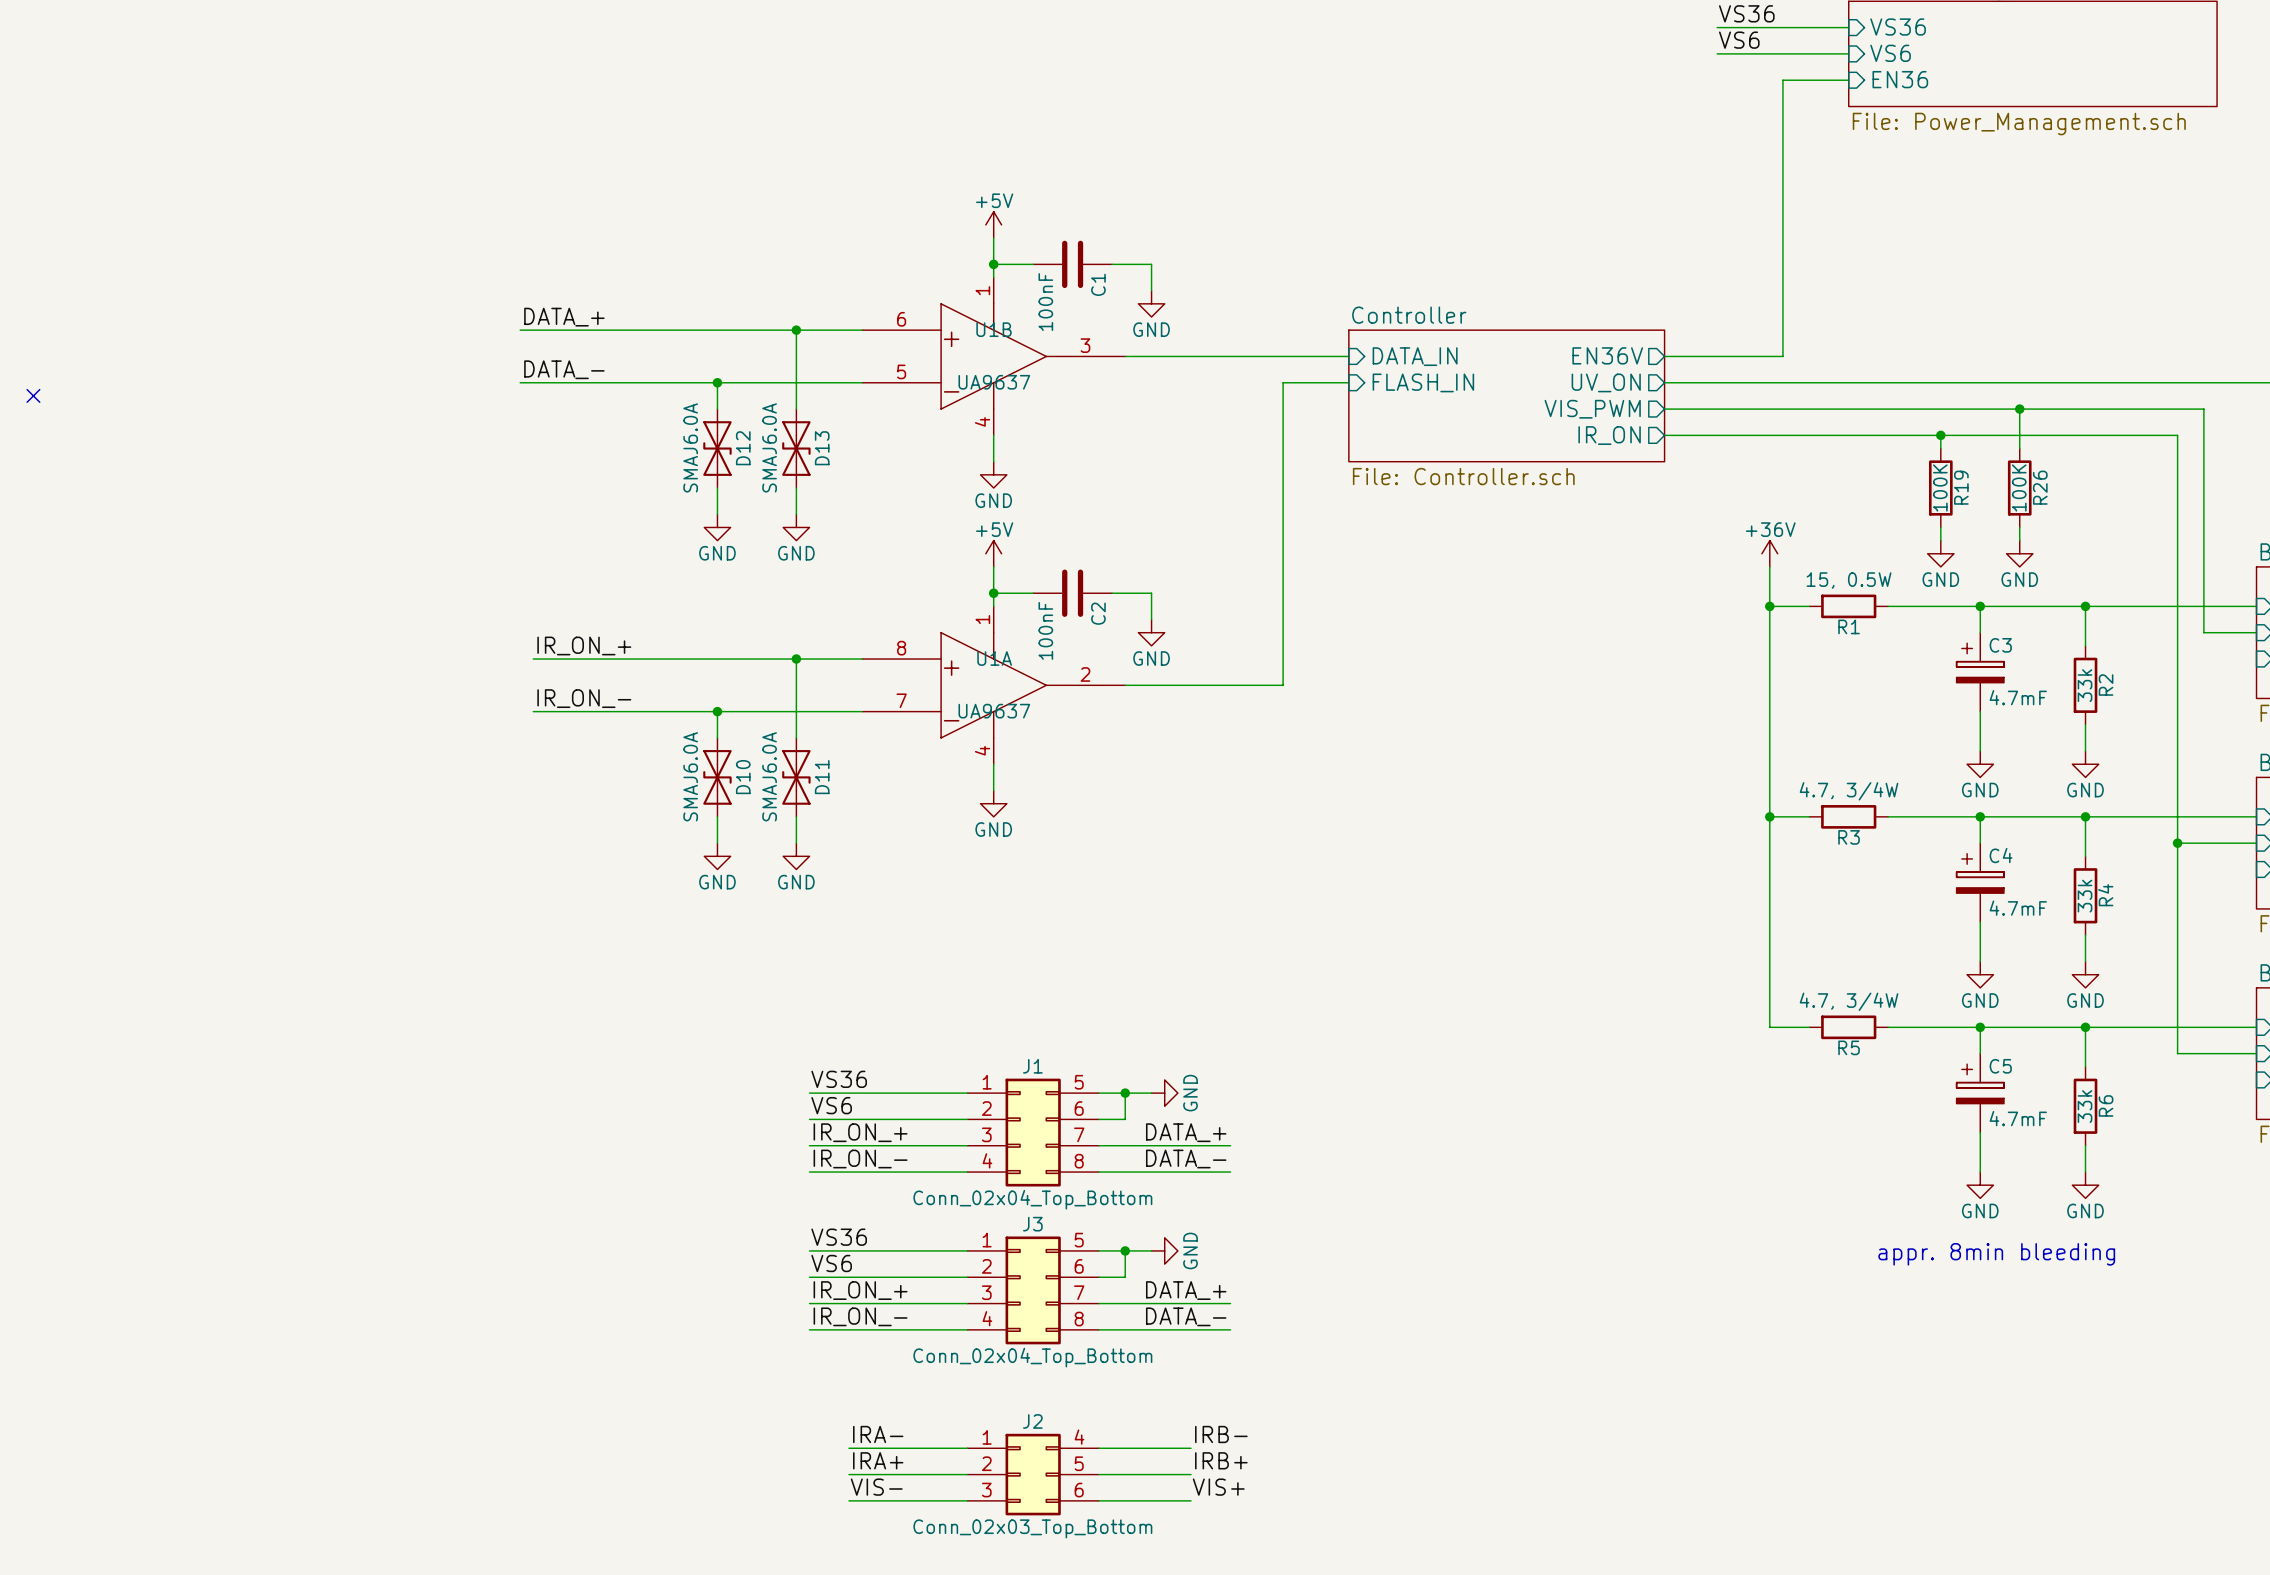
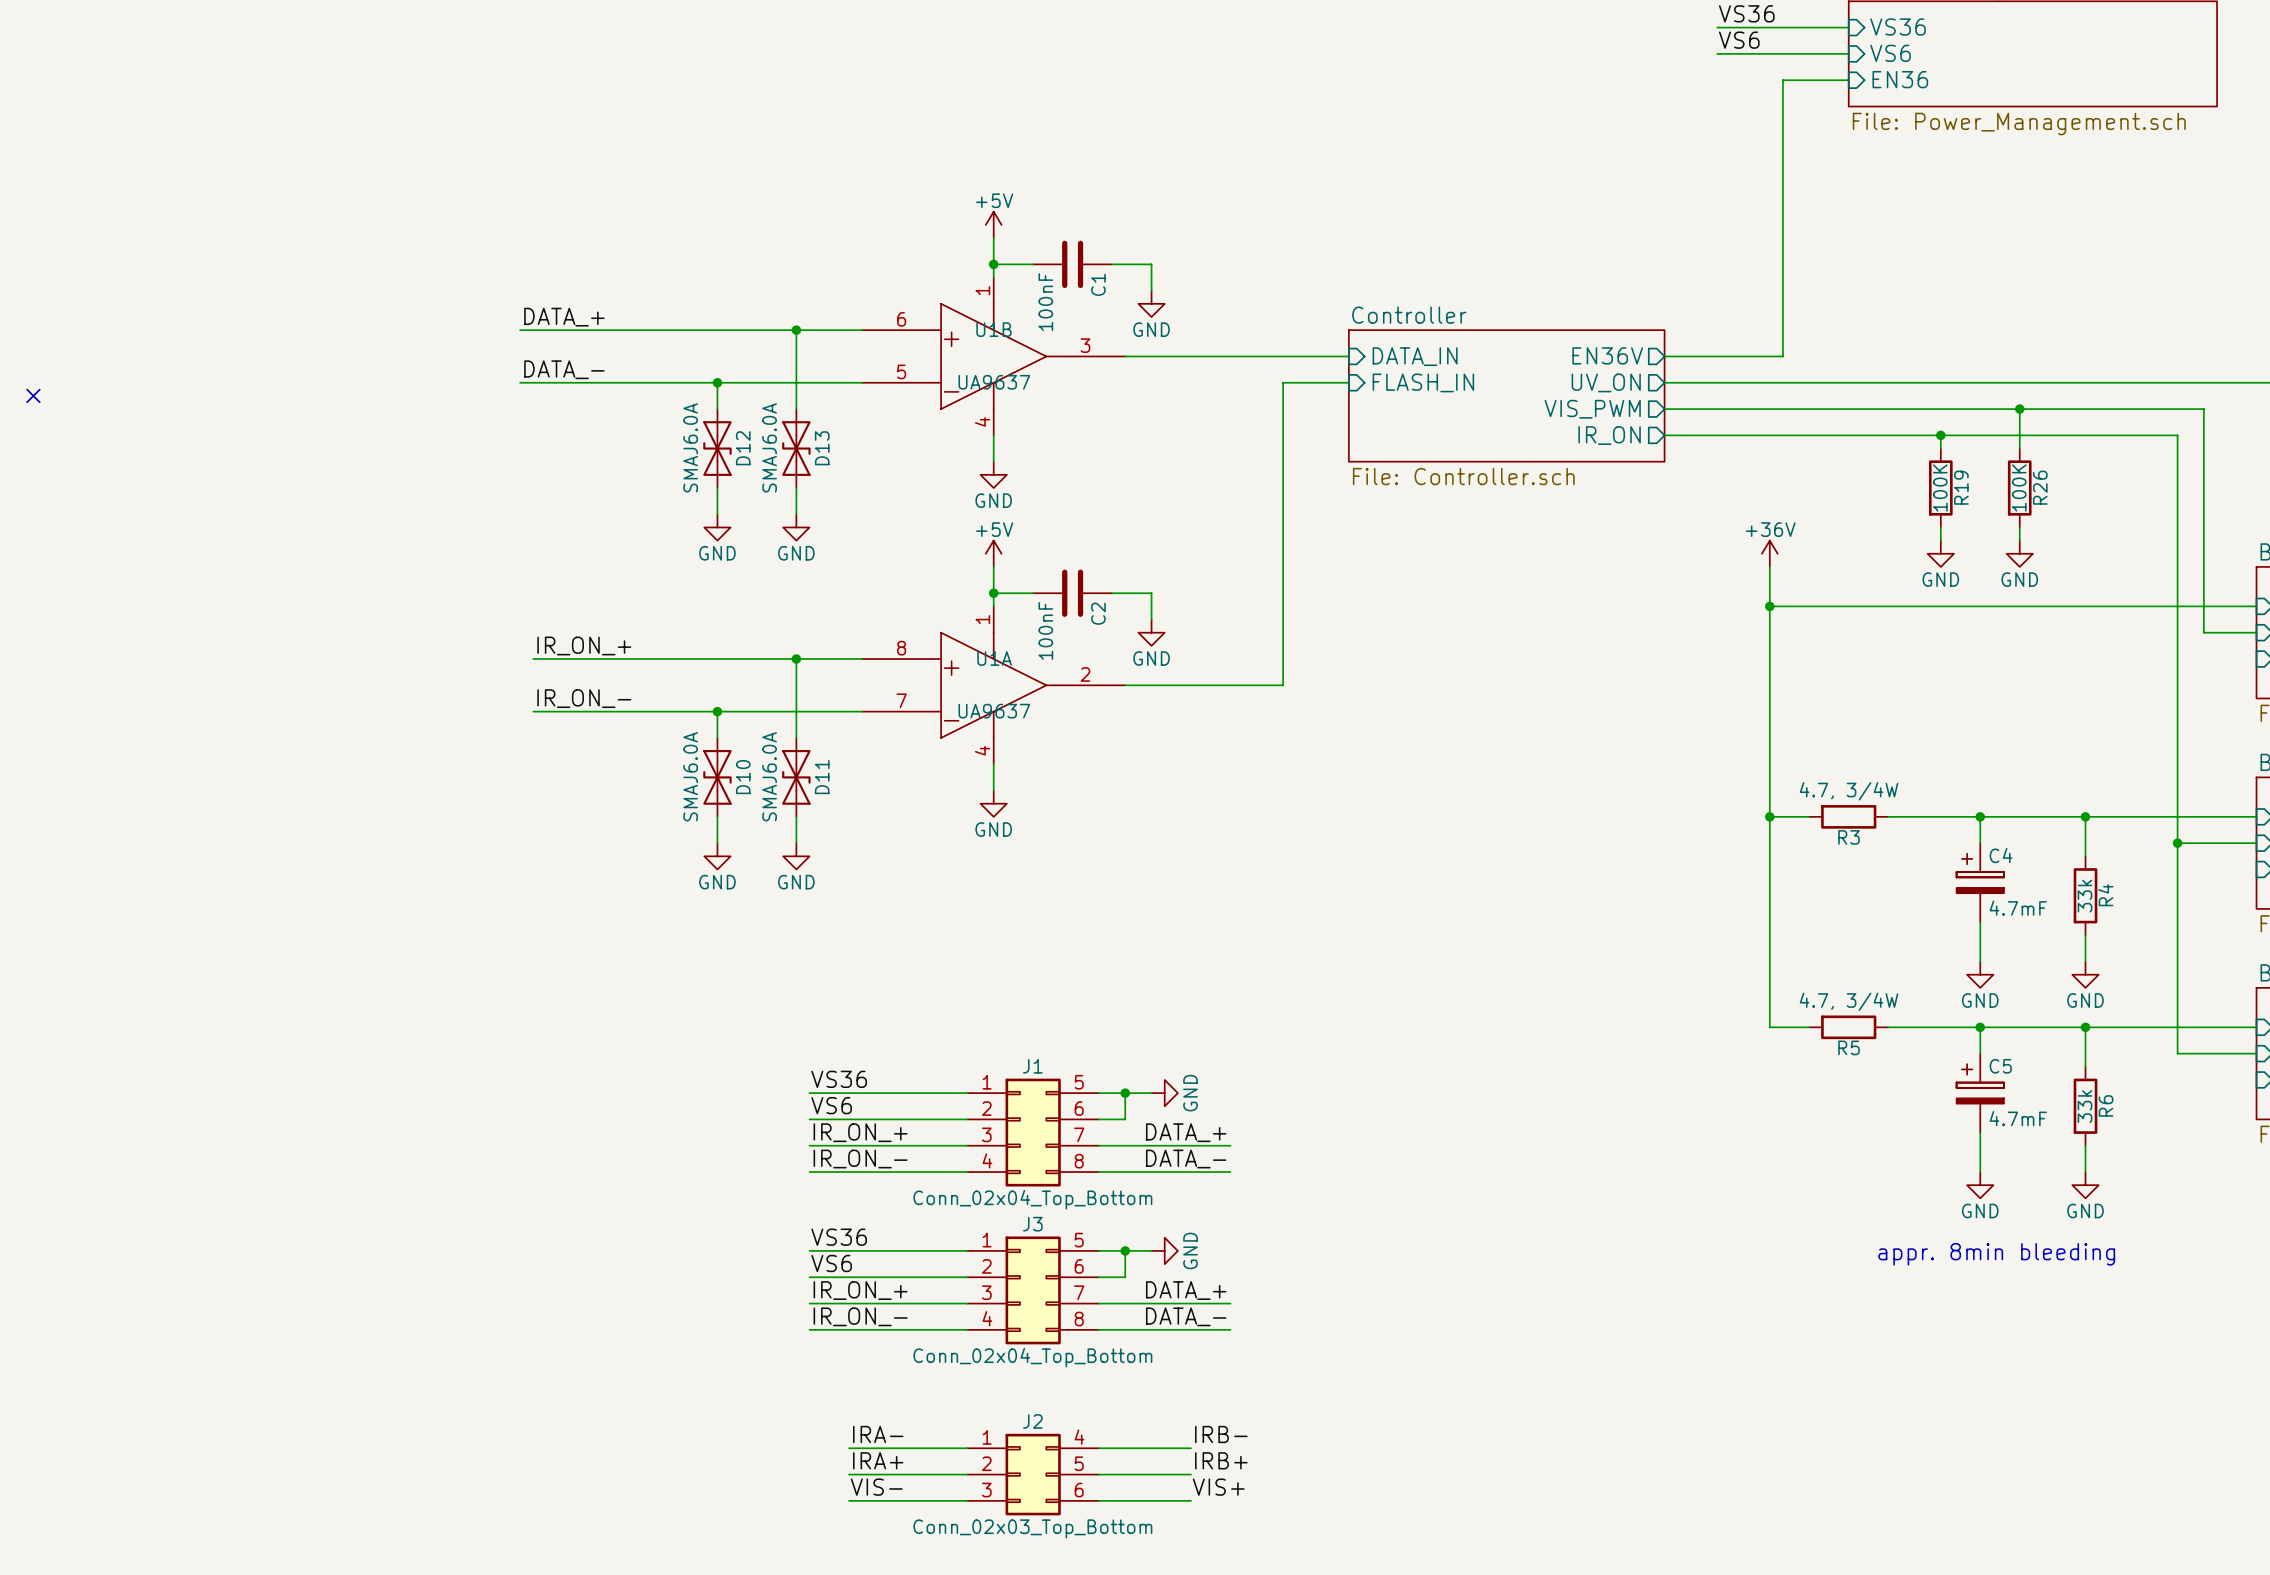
wire: none -> (1809, 606) (1888, 606)
R1: 15, 0.5W (1848, 606) -> none
wire: (1980, 606) (1980, 632) -> none
junction: (1980, 606) -> none
wire: (2085, 606) (2085, 645) -> none
junction: (2085, 606) -> none
C3: 4.7mF (1980, 672) -> none
R2: 33k (2085, 685) -> none
wire: (1980, 711) (1980, 751) -> none
wire: (2085, 724) (2085, 751) -> none
power symbol: GND (1980, 764) -> none
power symbol: GND (2085, 764) -> none

